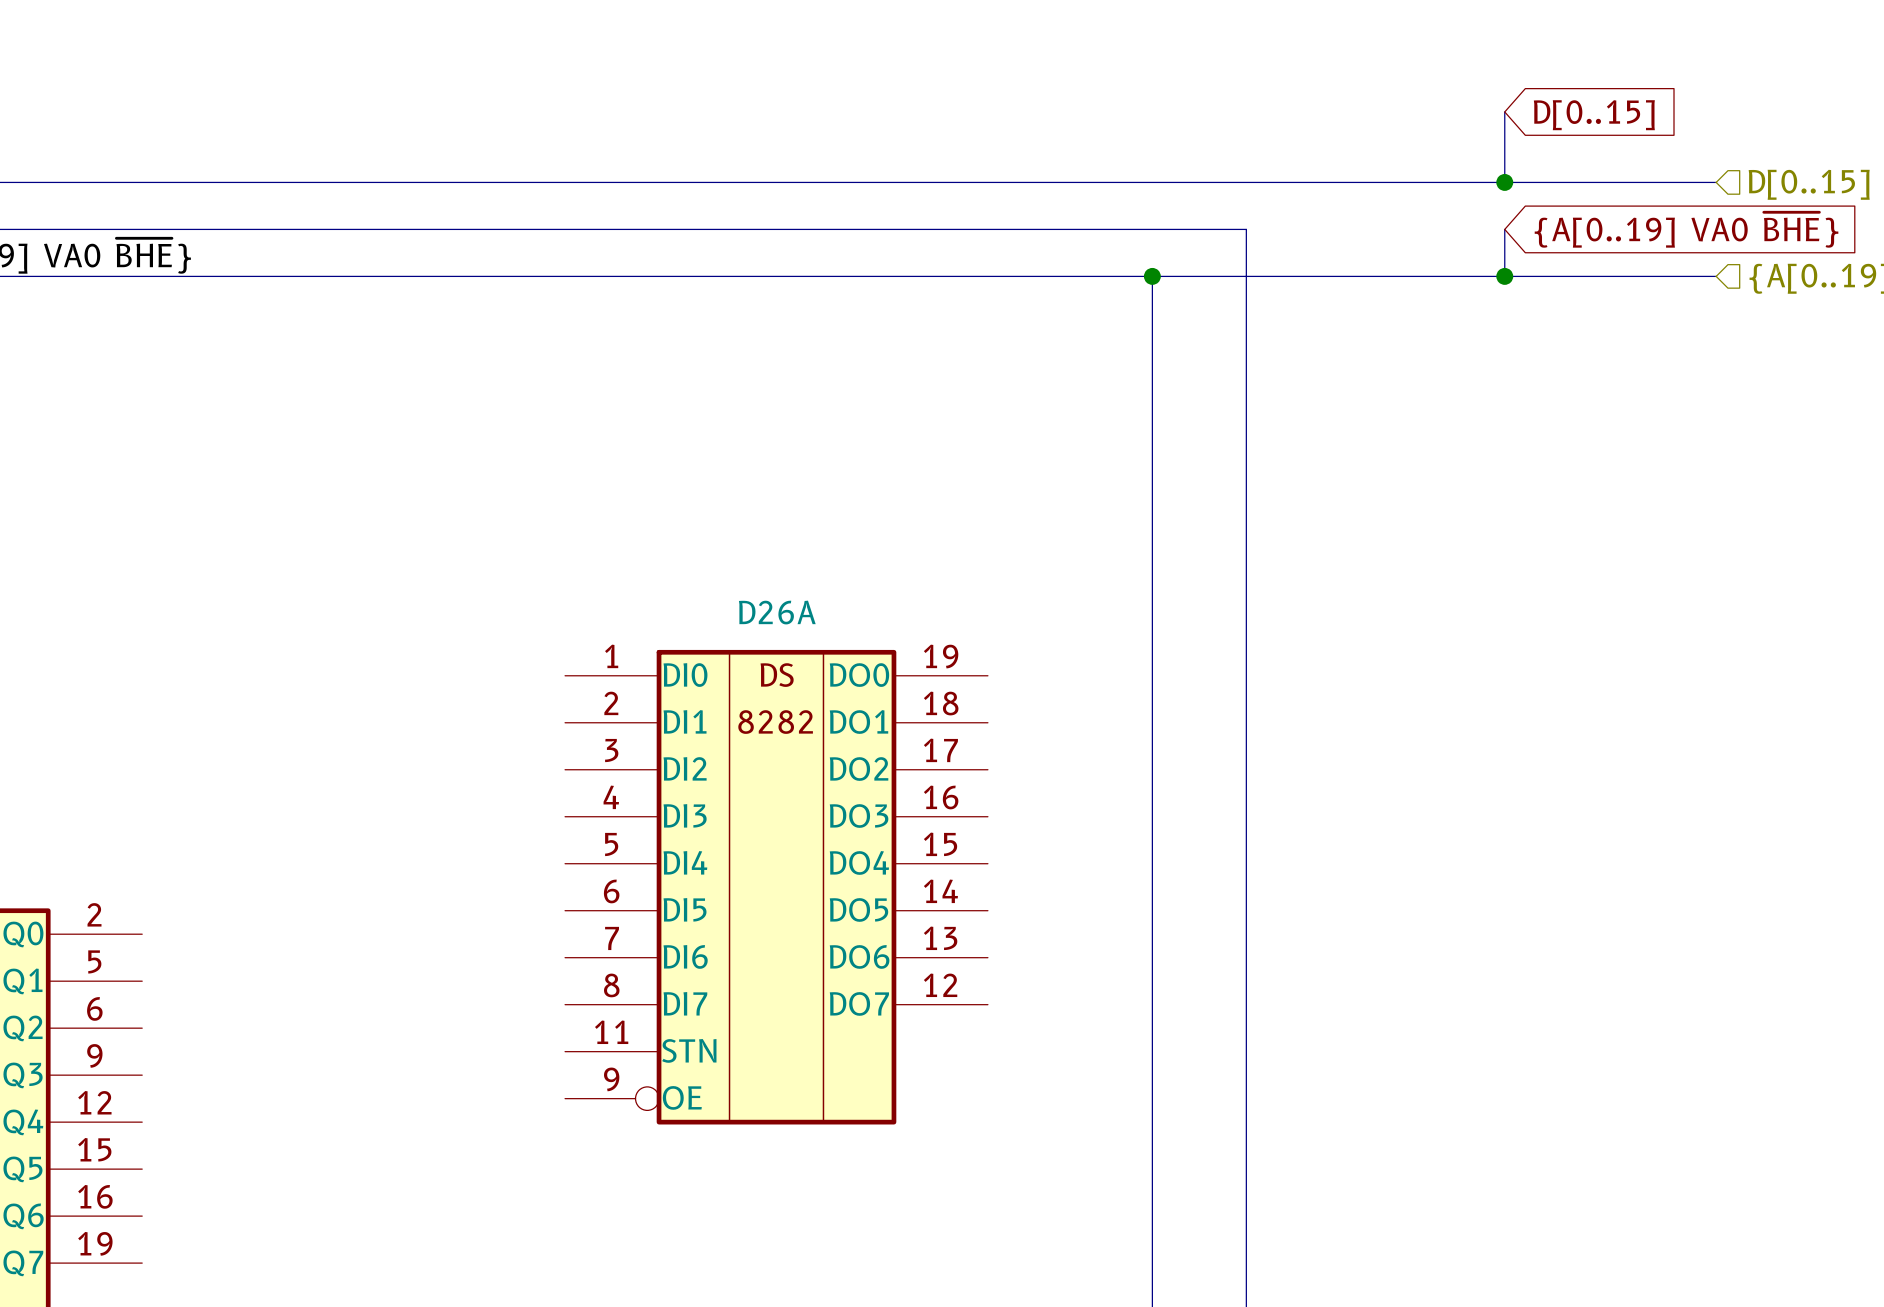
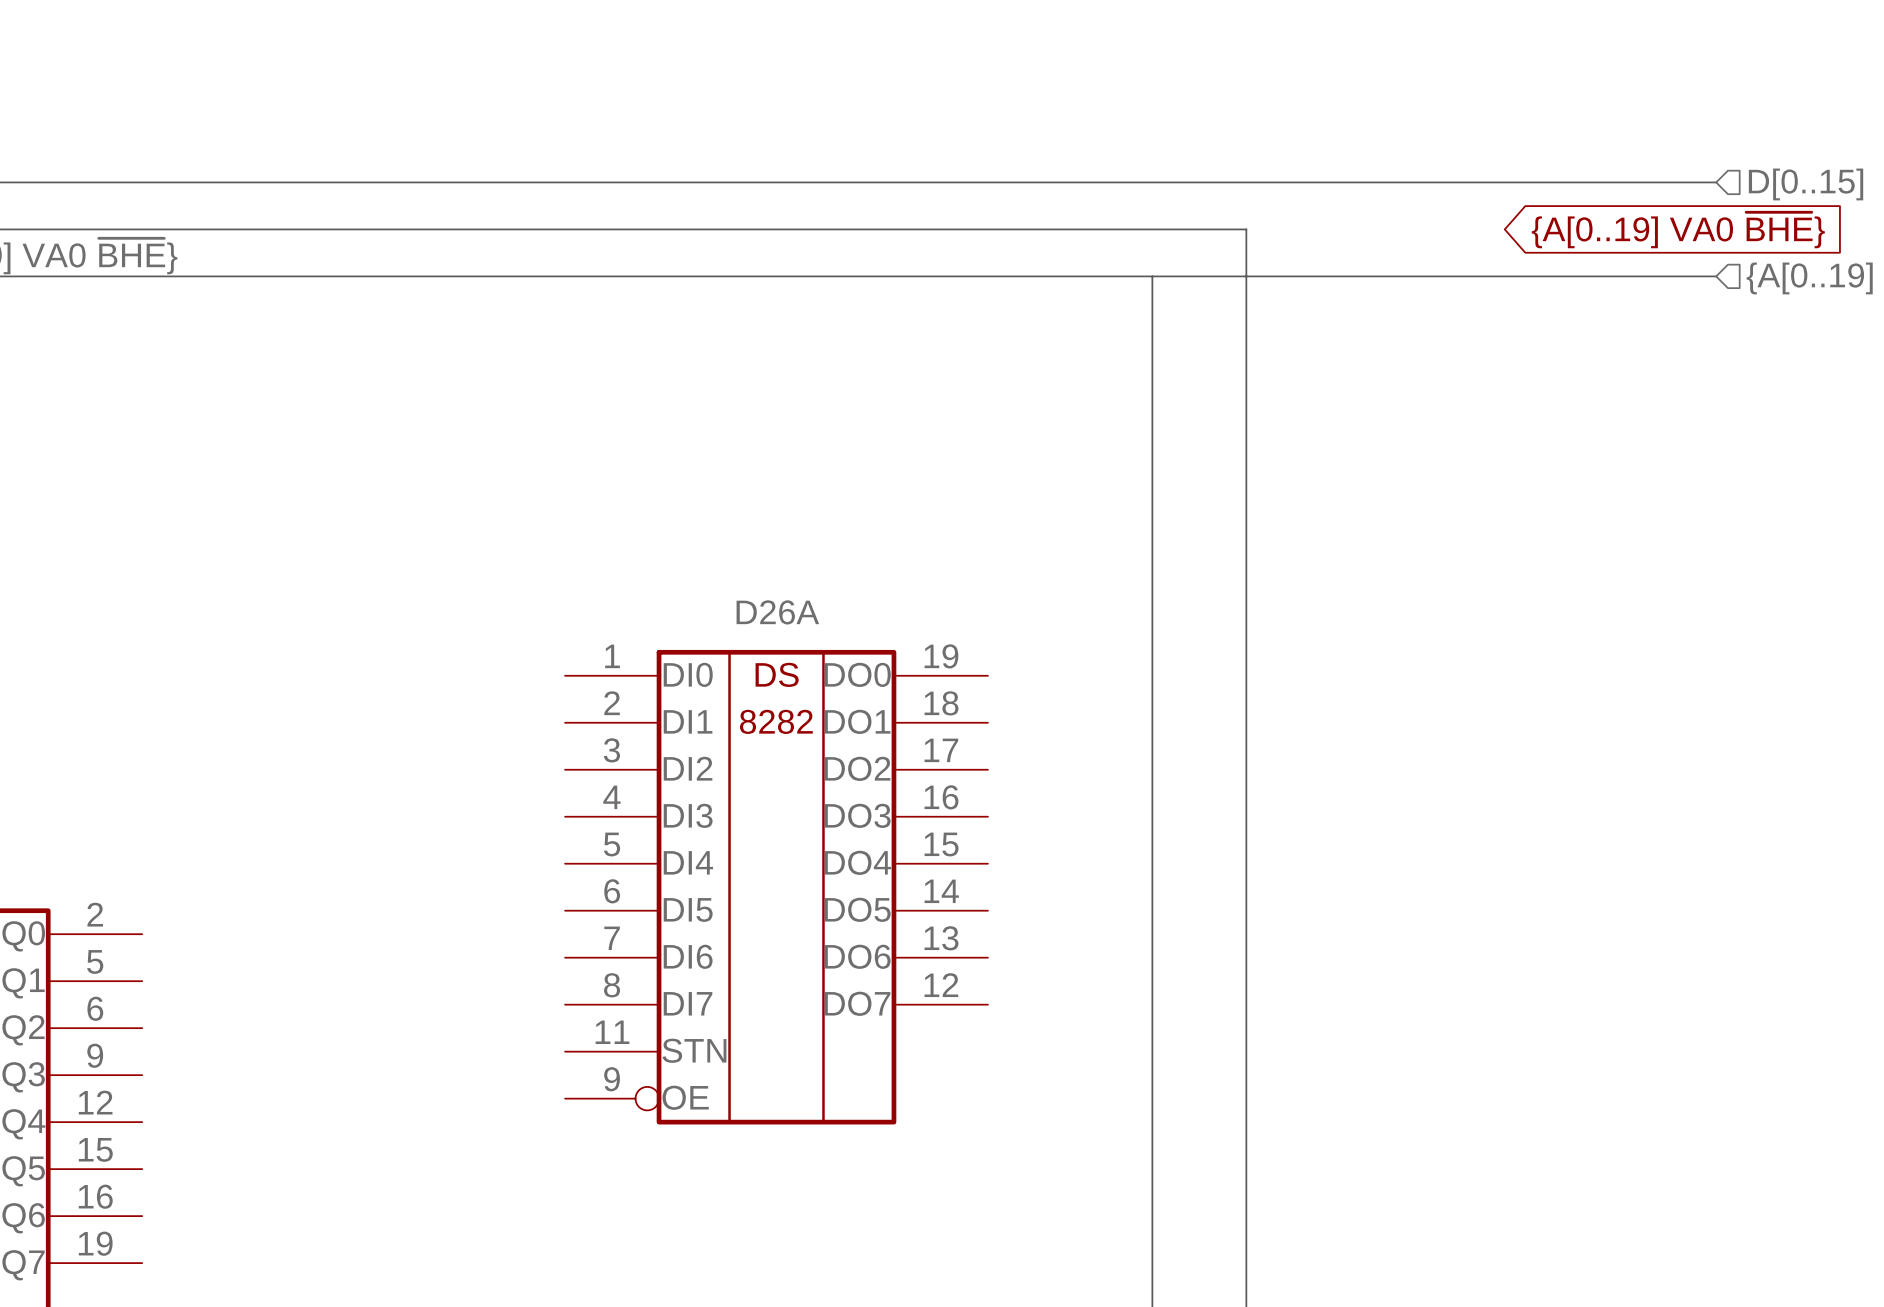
bus: (1504, 111) (1504, 182) -> none
global label: D[0..15] (1594, 115) -> none
junction: (1504, 182) -> none
bus: (1504, 229) (1504, 276) -> none
junction: (1152, 276) -> none
junction: (1504, 276) -> none

